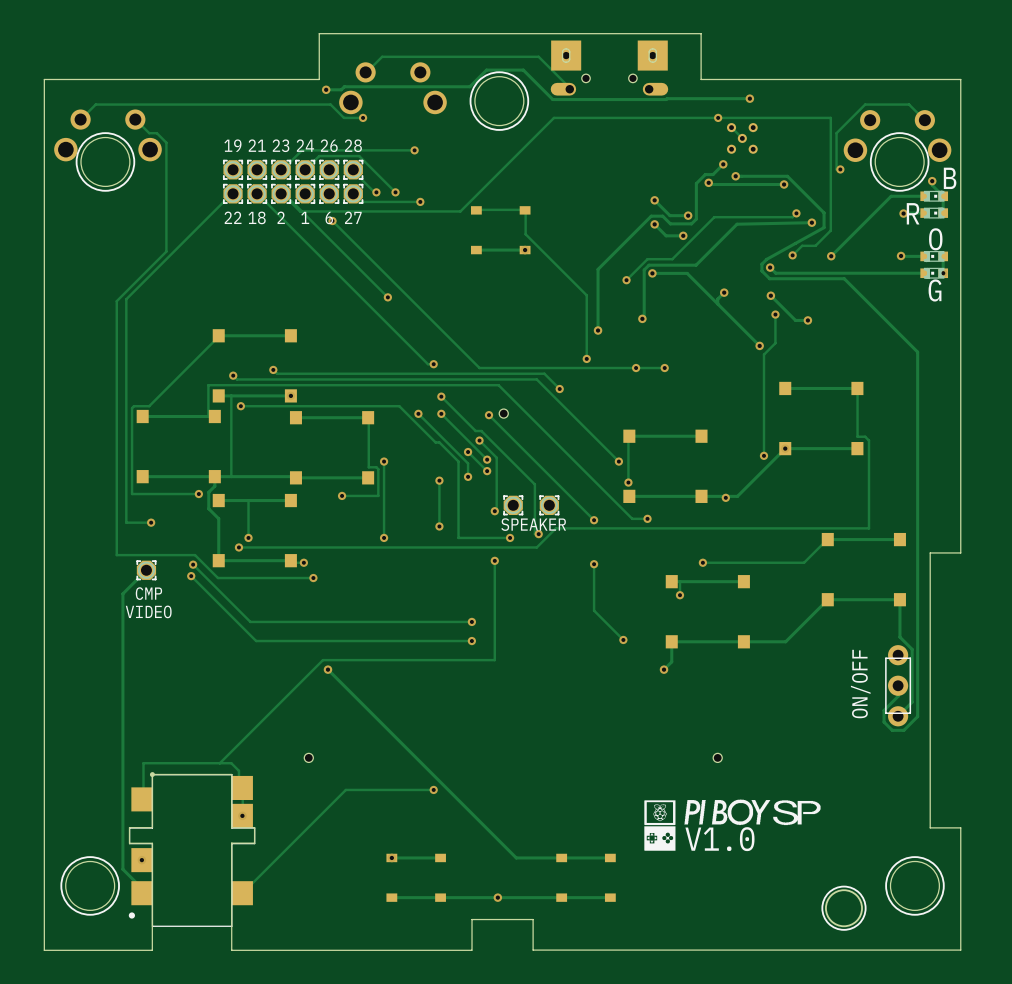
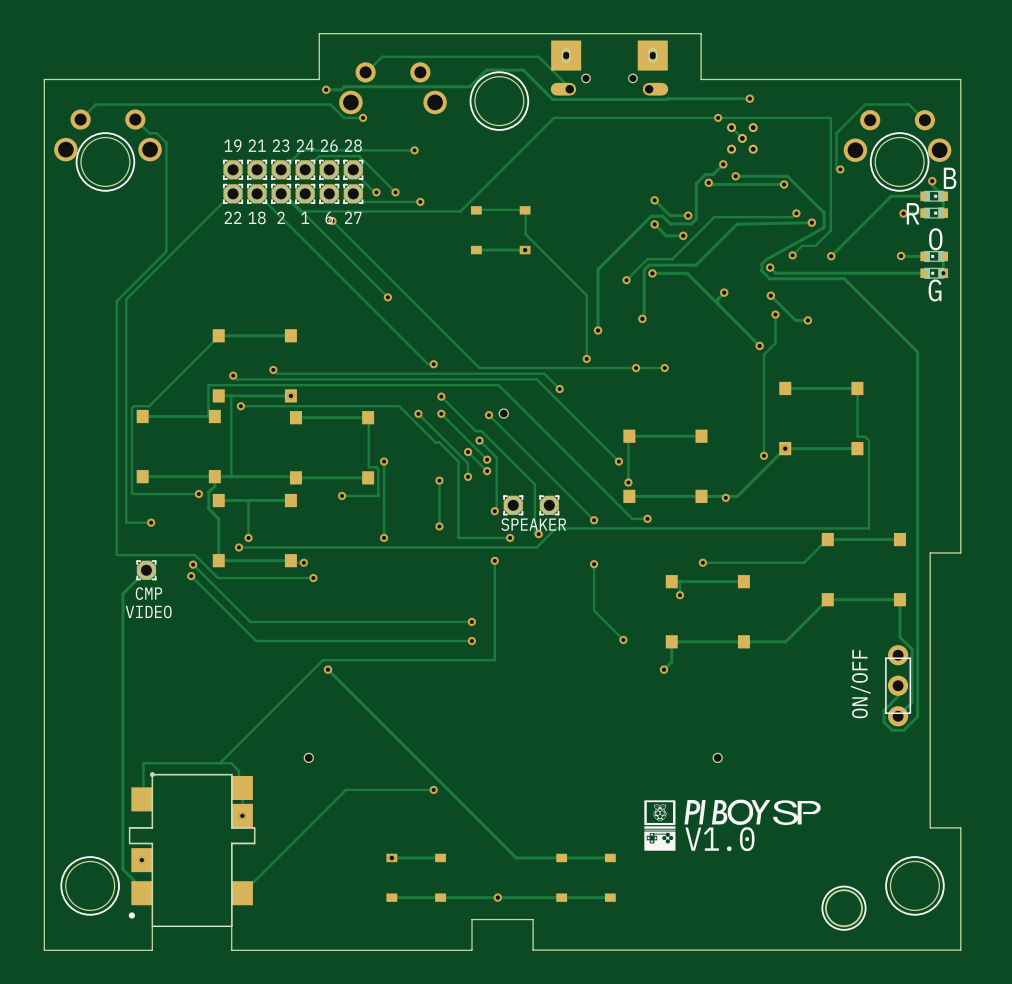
drawing: [644, 828, 676, 835] -> none

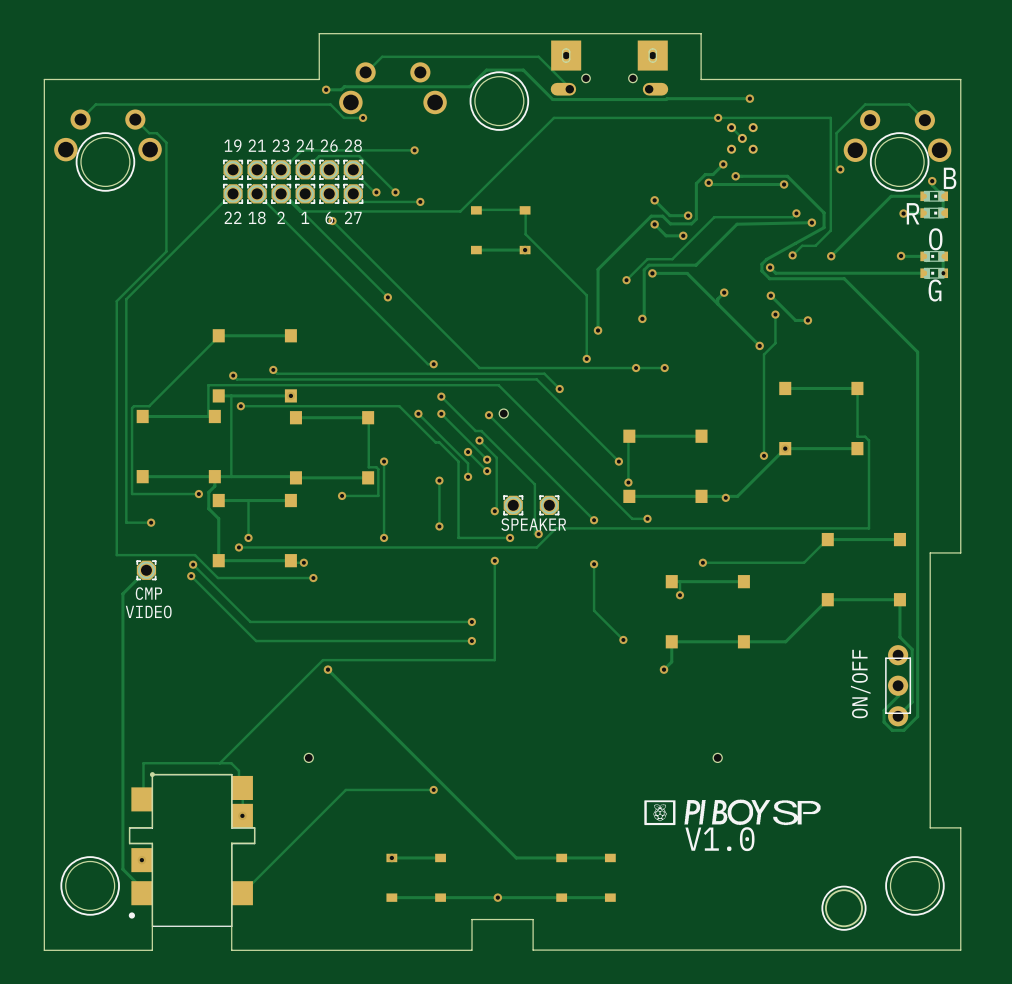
drawing: [644, 826, 676, 851] -> none

